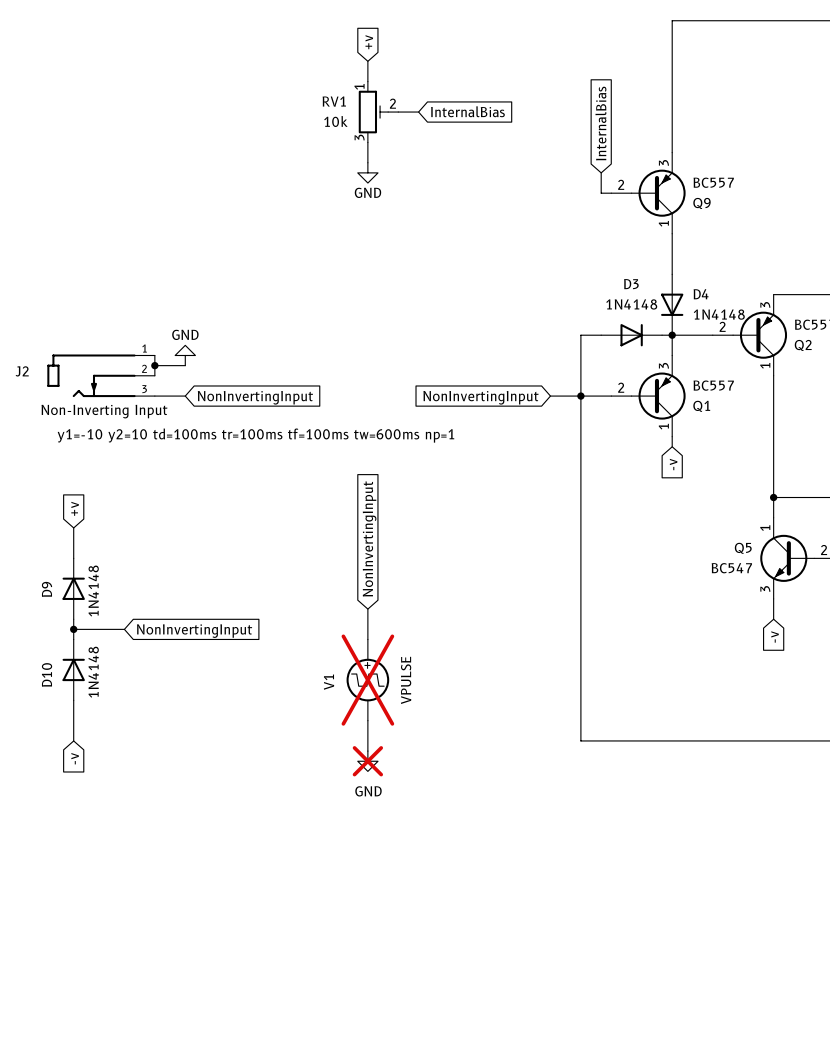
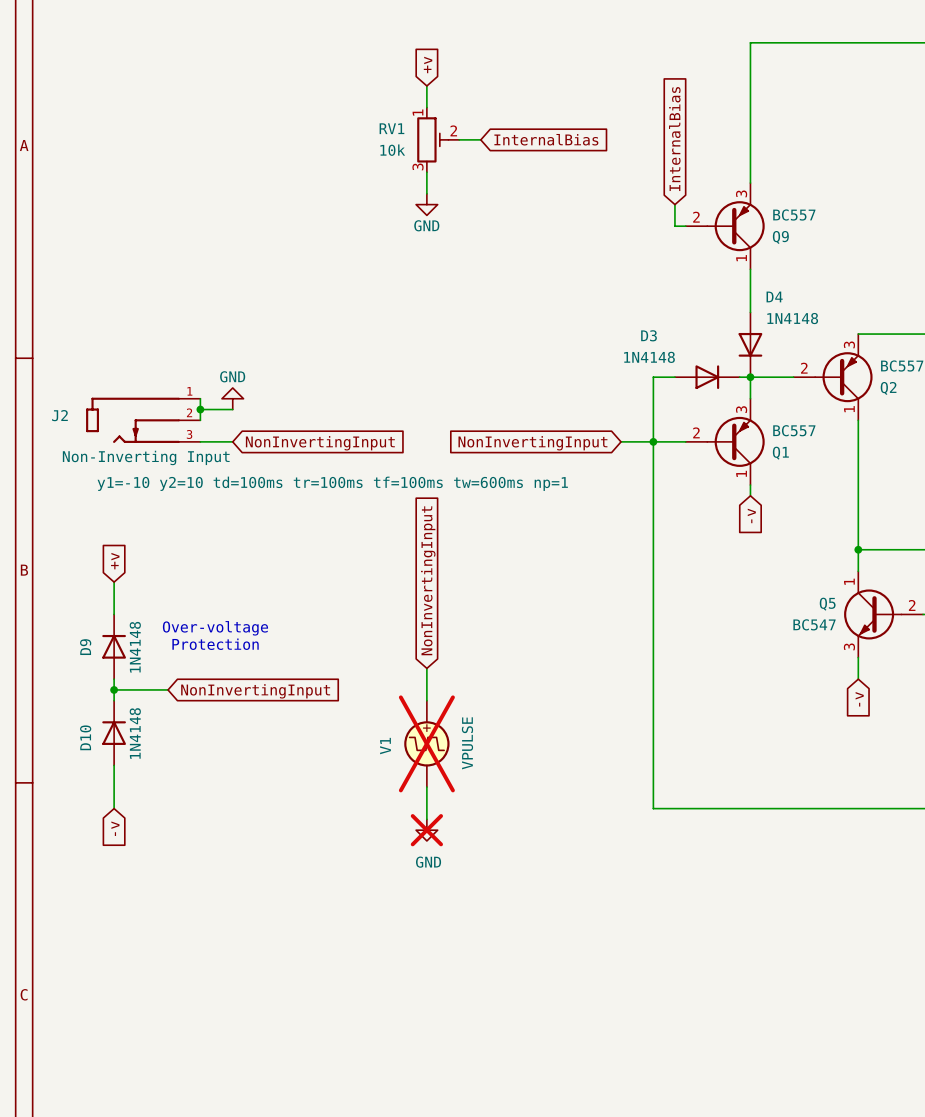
D3 name position: D3 (631, 284) -> D3 (649, 335)
D4 name position: D4 (701, 294) -> D4 (774, 296)
D3 value position: 1N4148 (631, 304) -> 1N4148 (649, 357)
D4 value position: 1N4148 (719, 314) -> 1N4148 (792, 318)
text: none -> Over-voltage (215, 628)
text: none -> Protection (215, 644)

